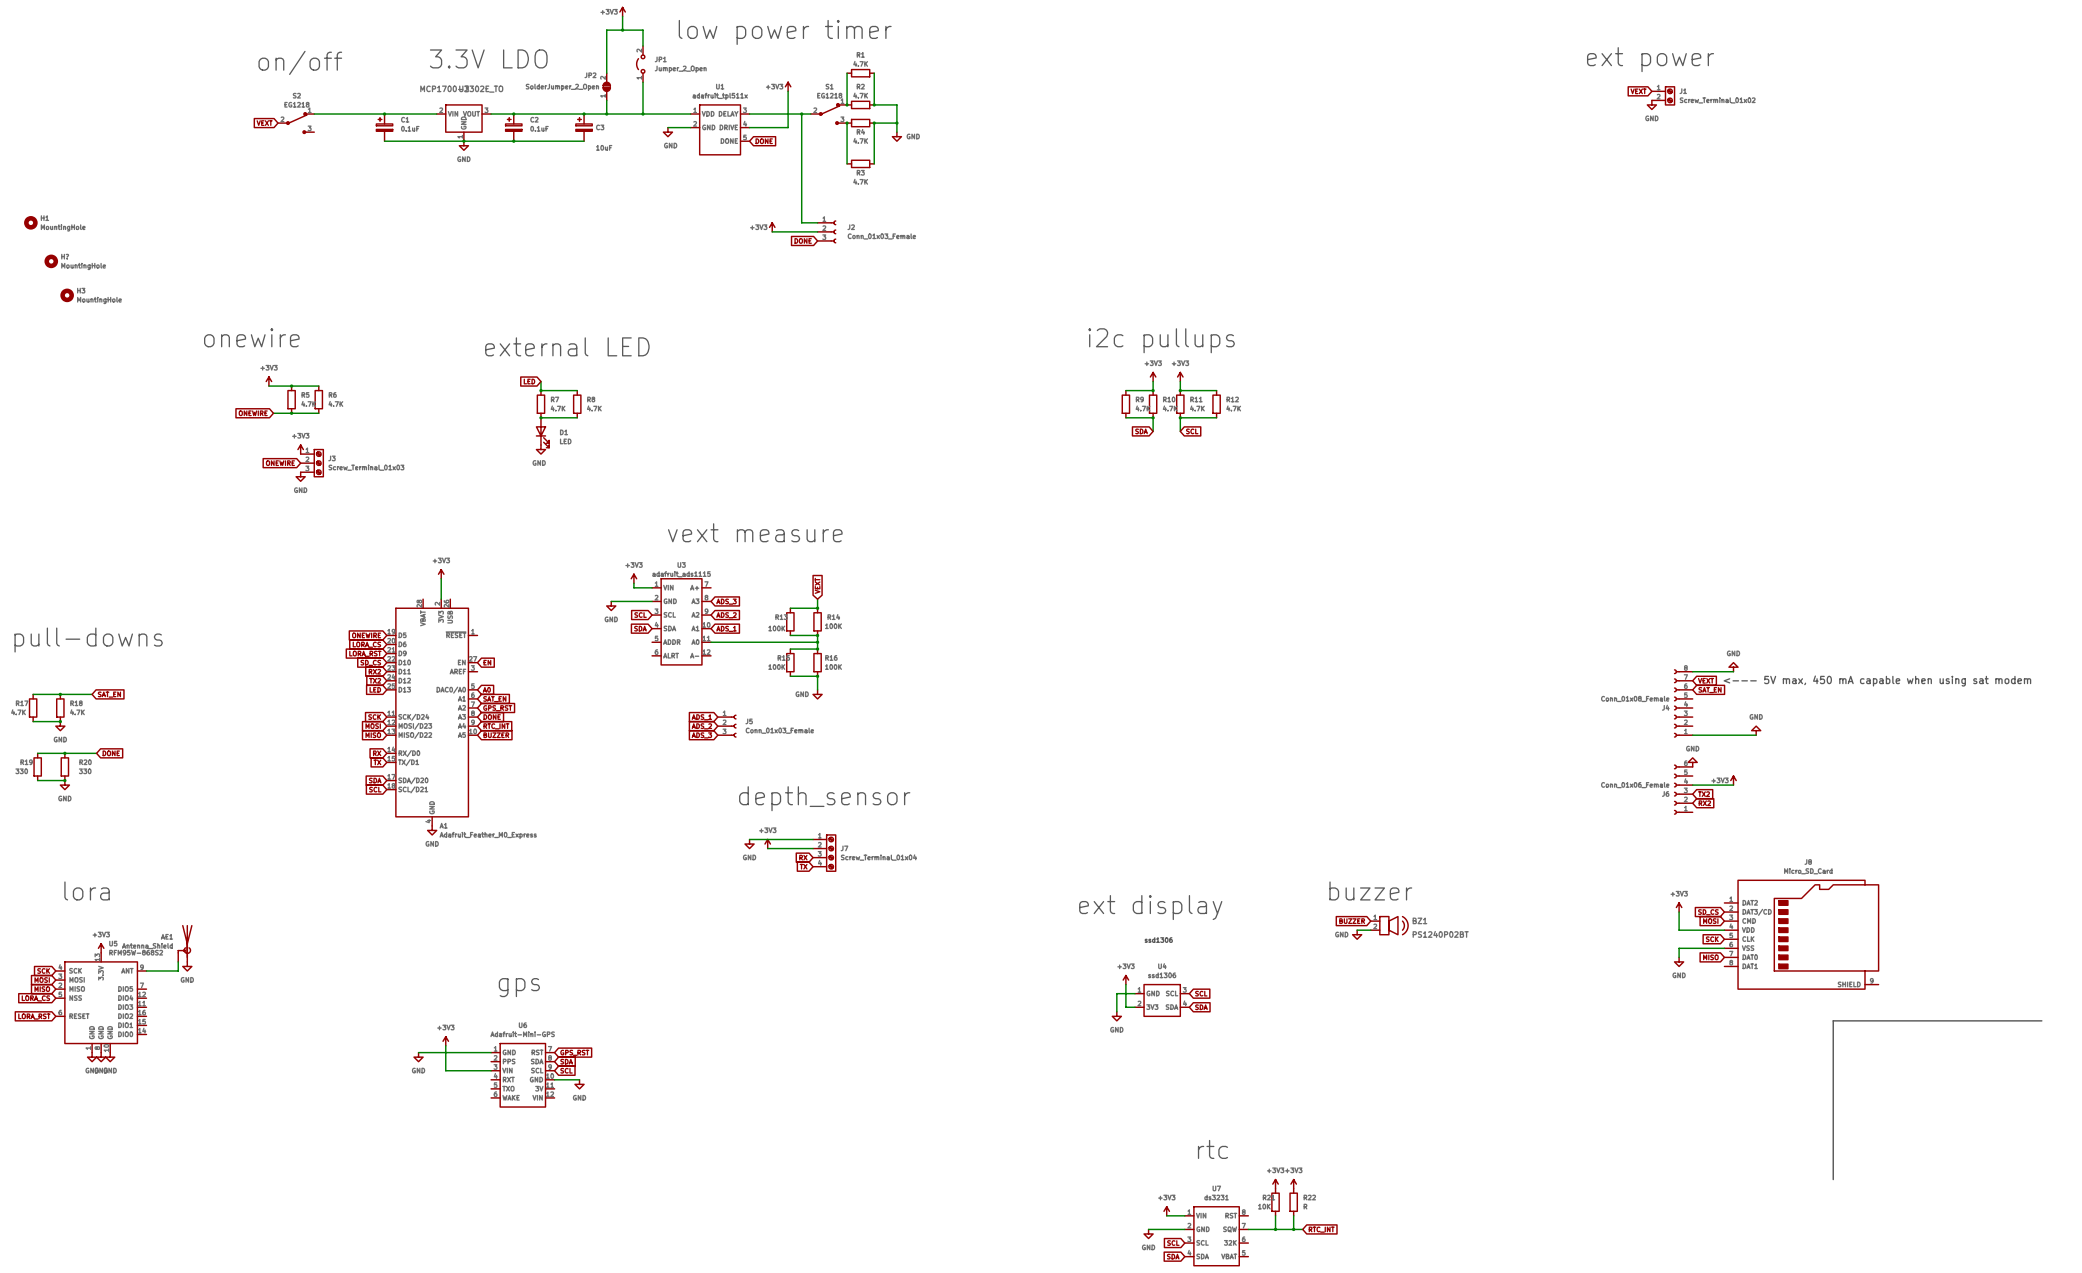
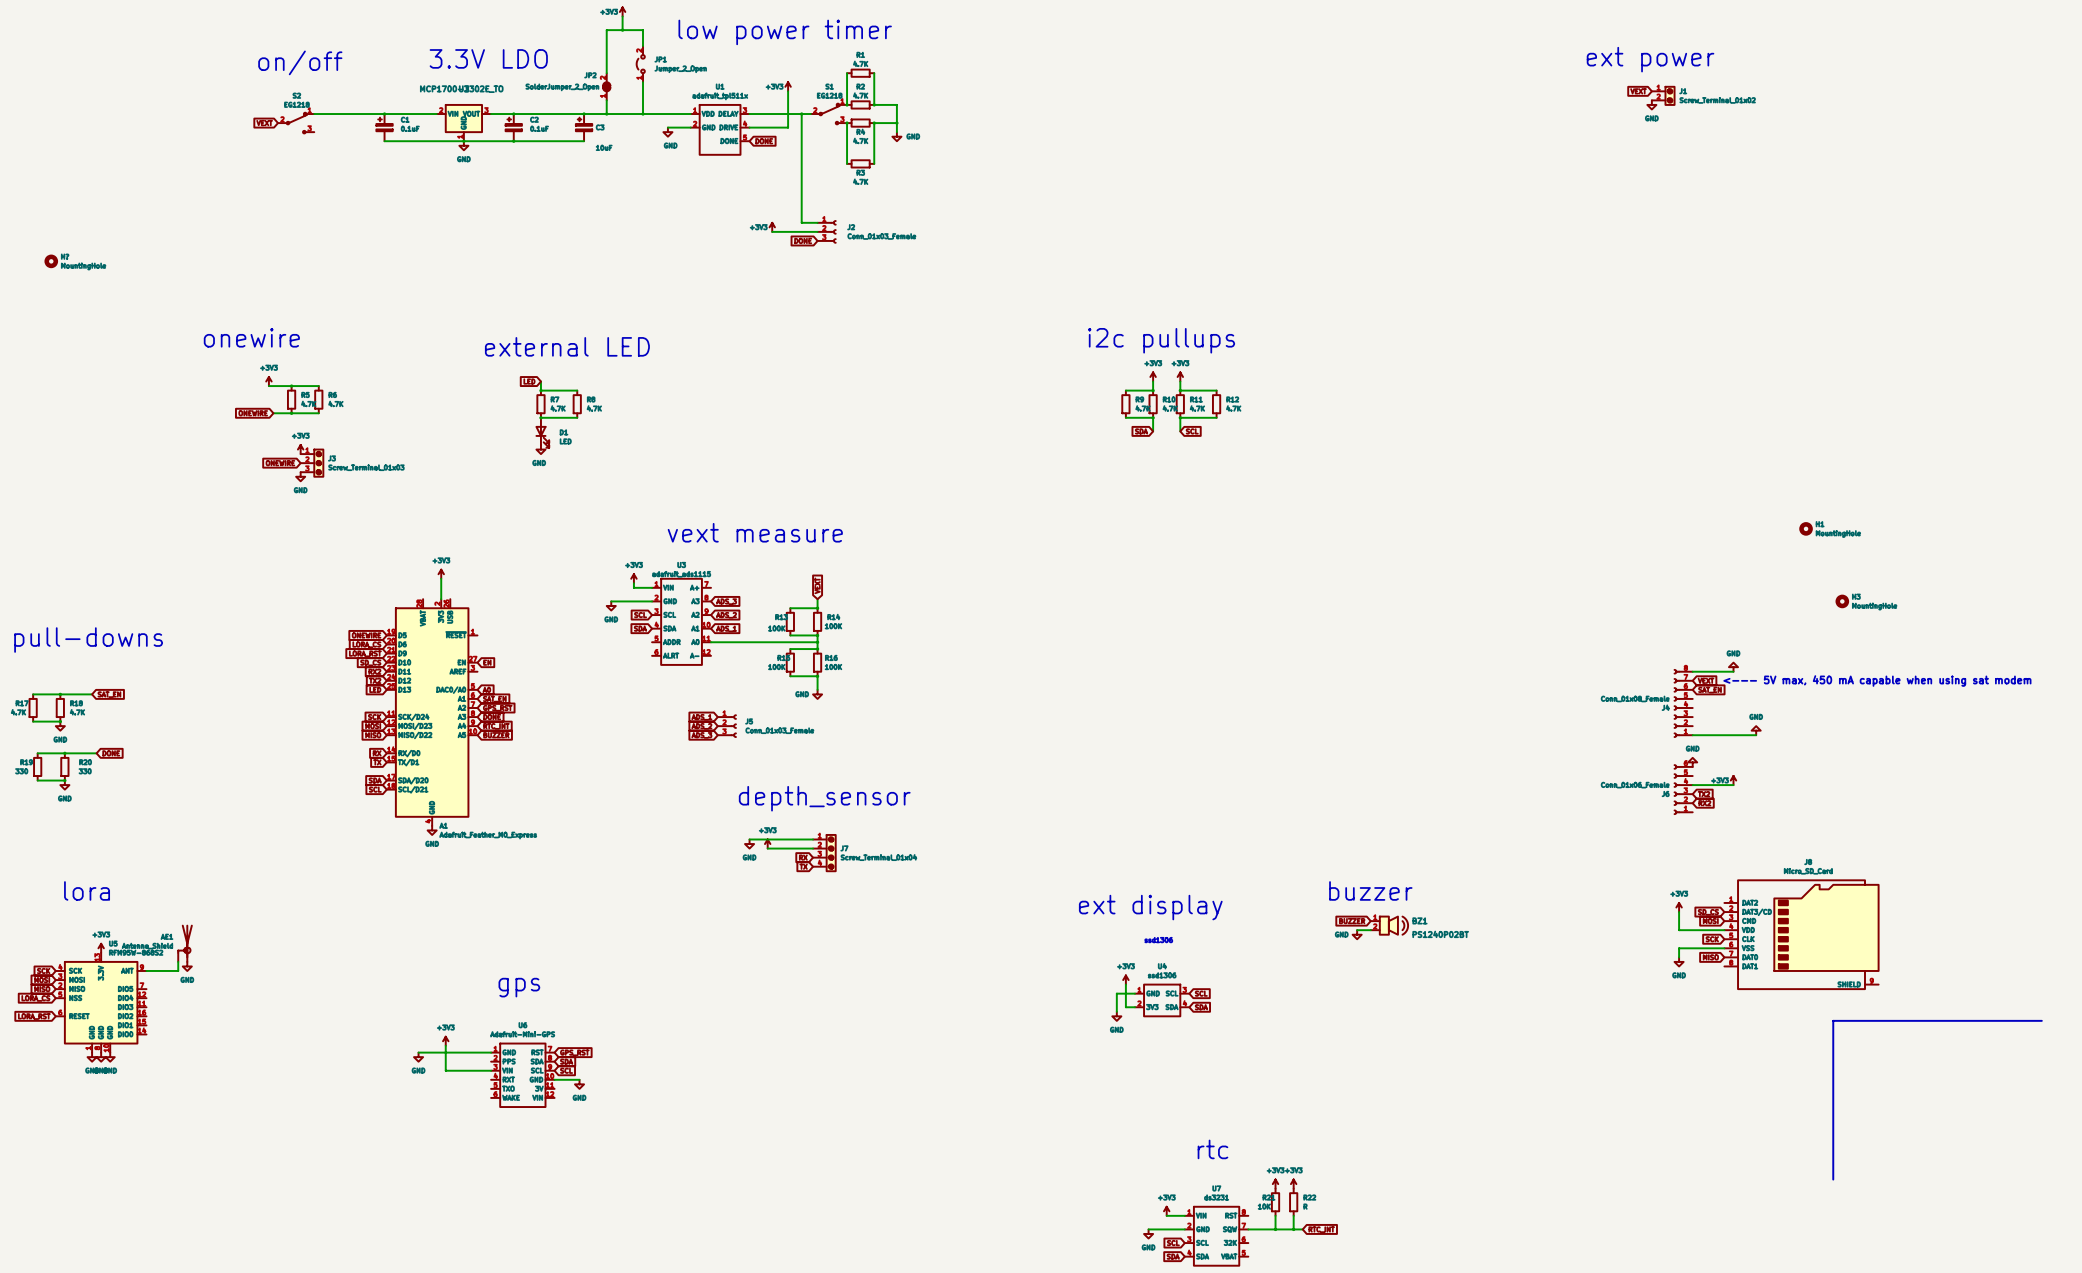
part position: (30, 222) -> (1806, 528)
part position: (67, 295) -> (1842, 601)

